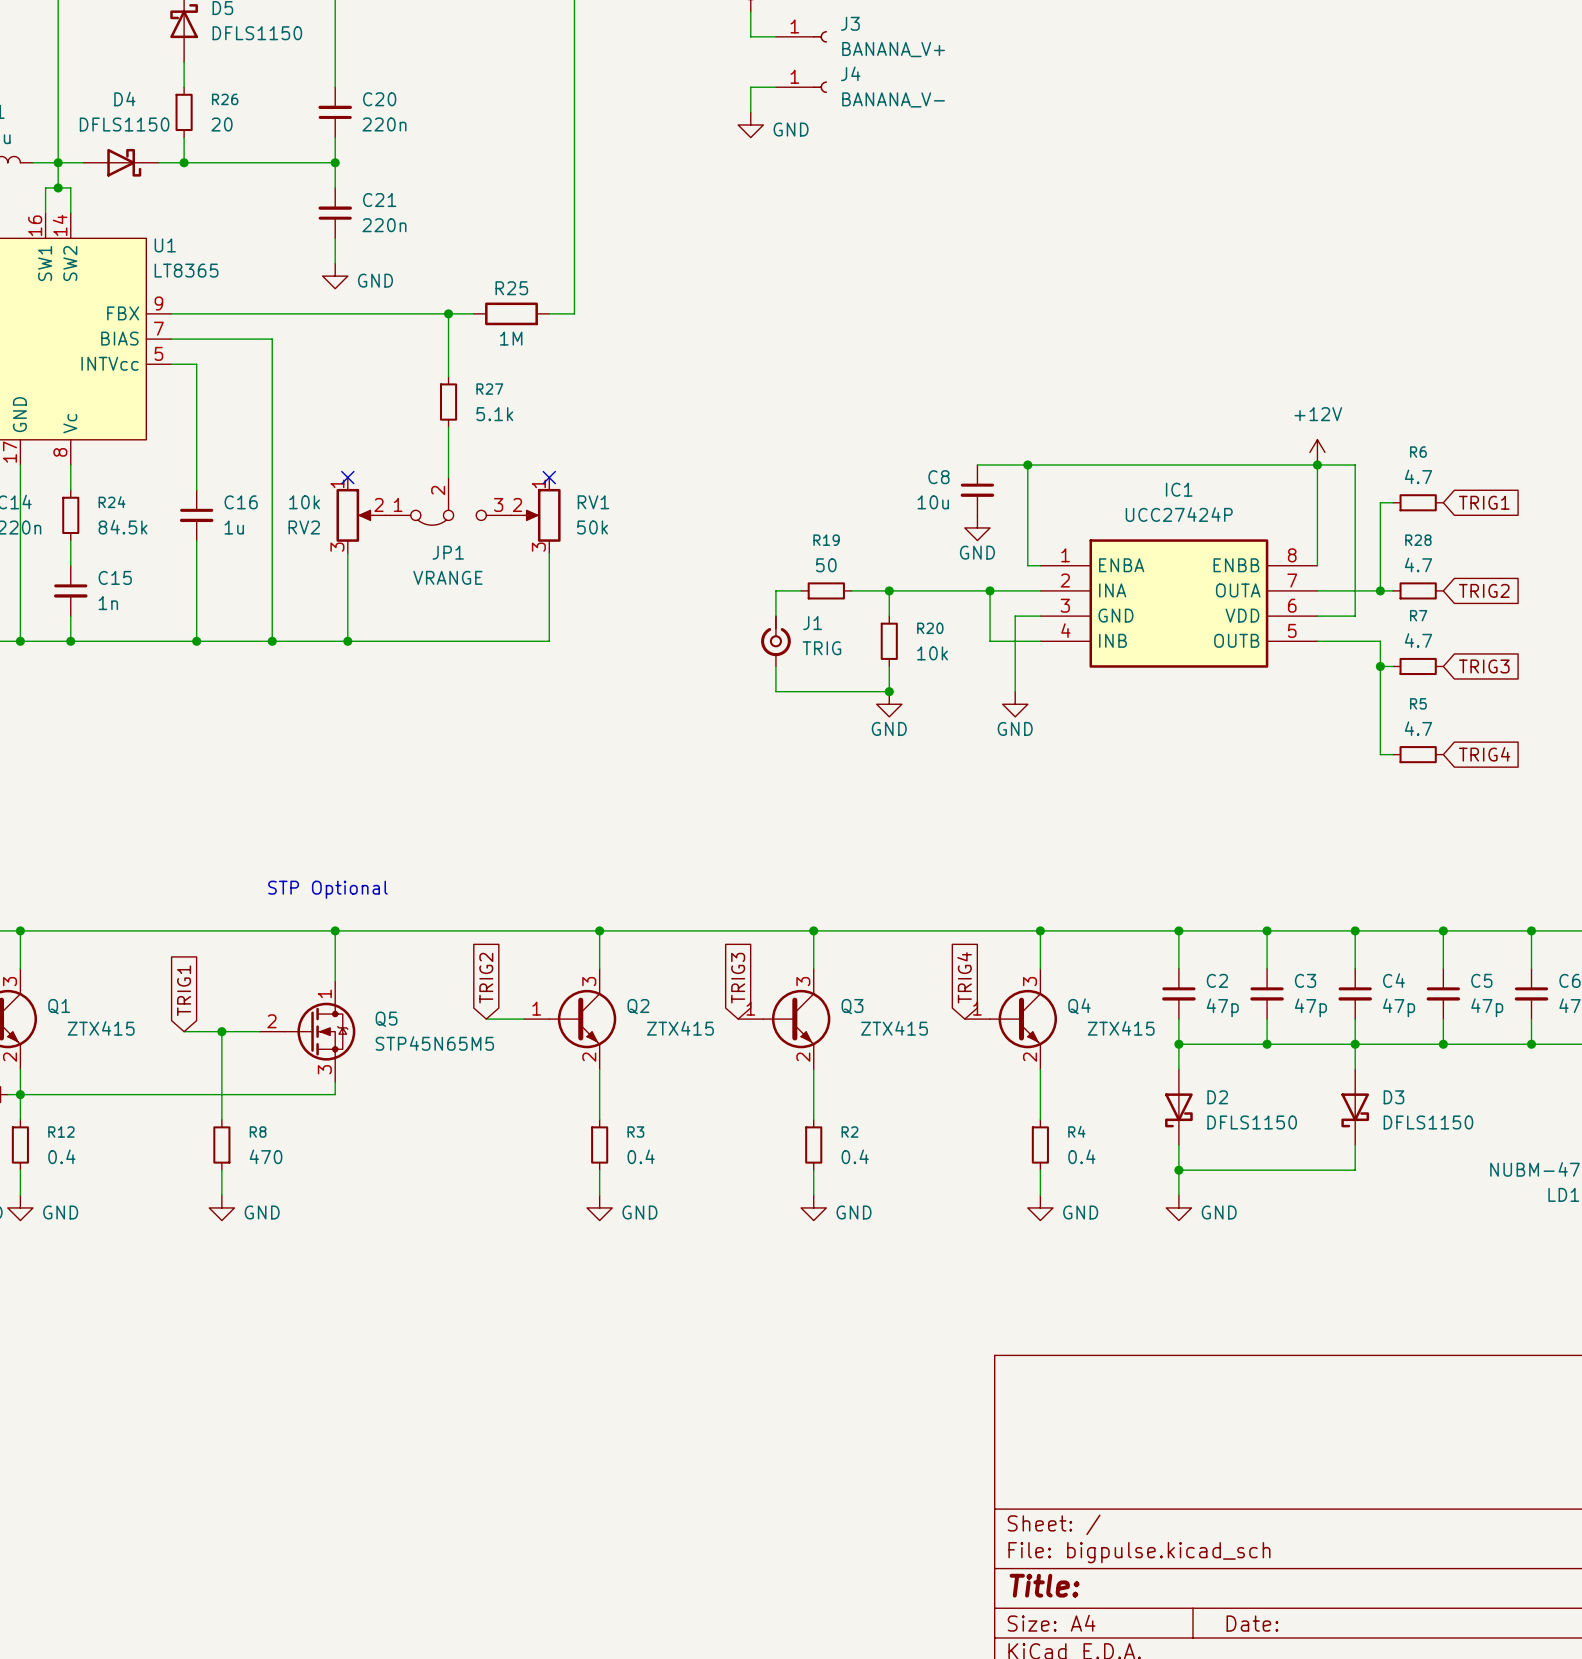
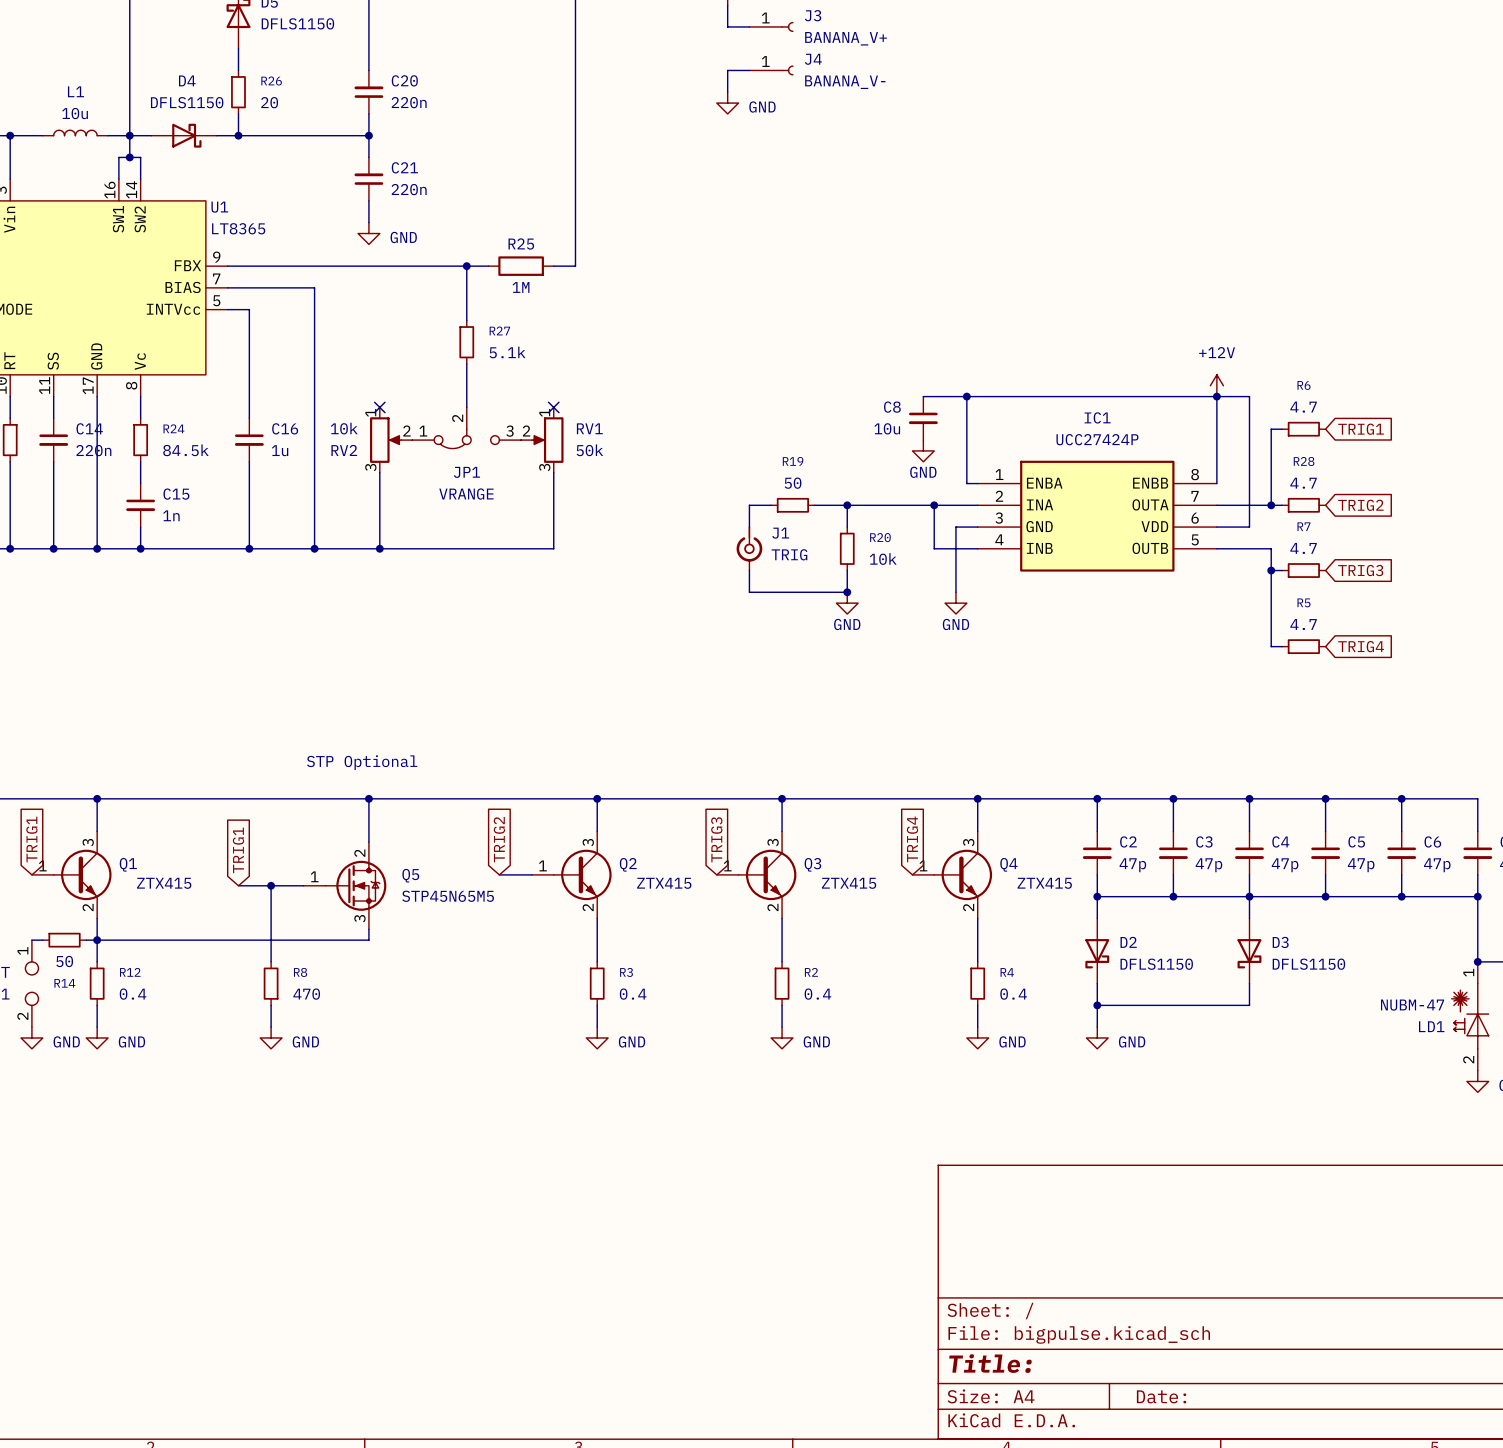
Q5 pin number: 1 (324, 993) -> 2 (359, 853)
Q5 pin number: 2 (271, 1021) -> 1 (314, 876)

